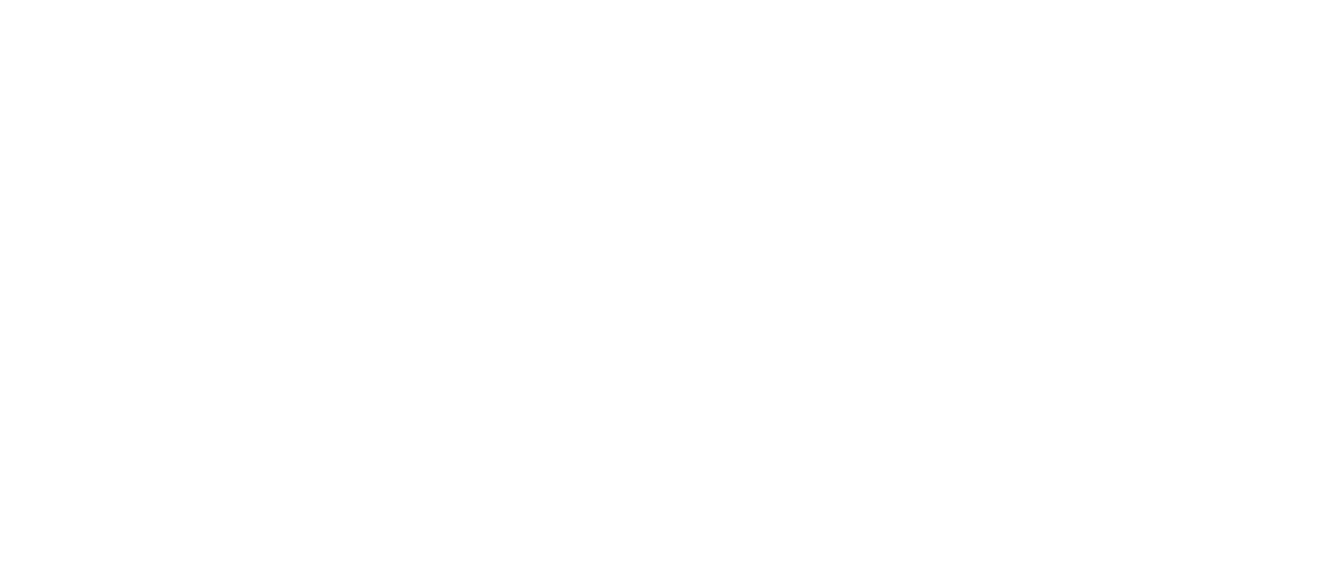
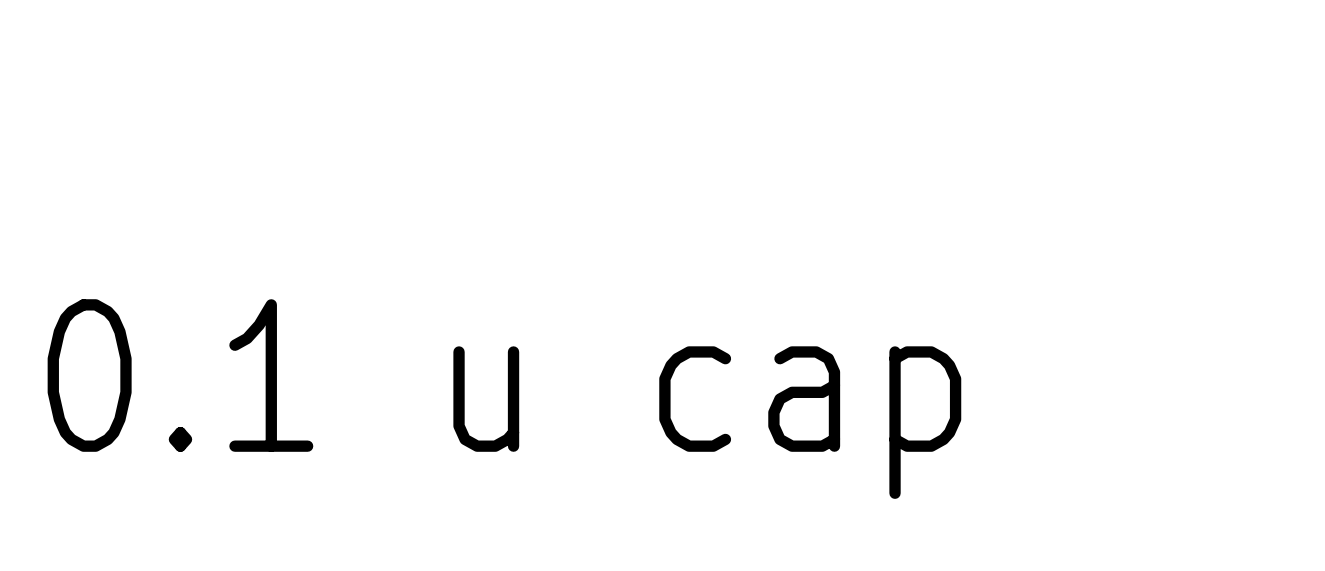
text: none -> 0.1 u cap (504, 399)

